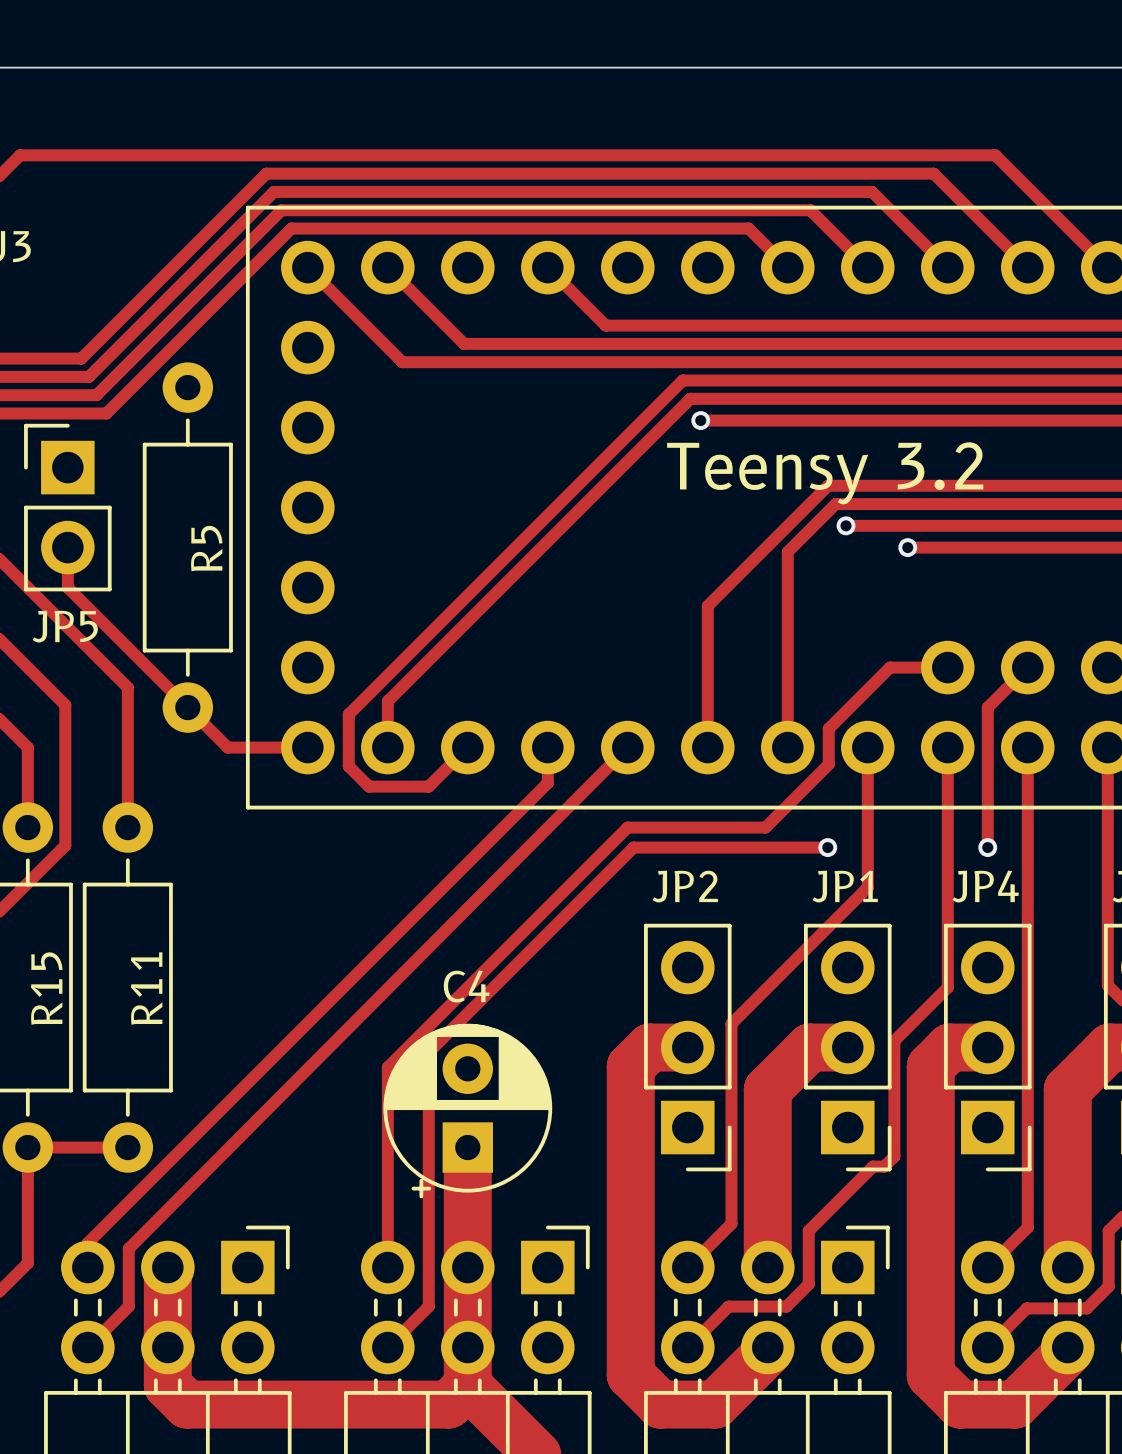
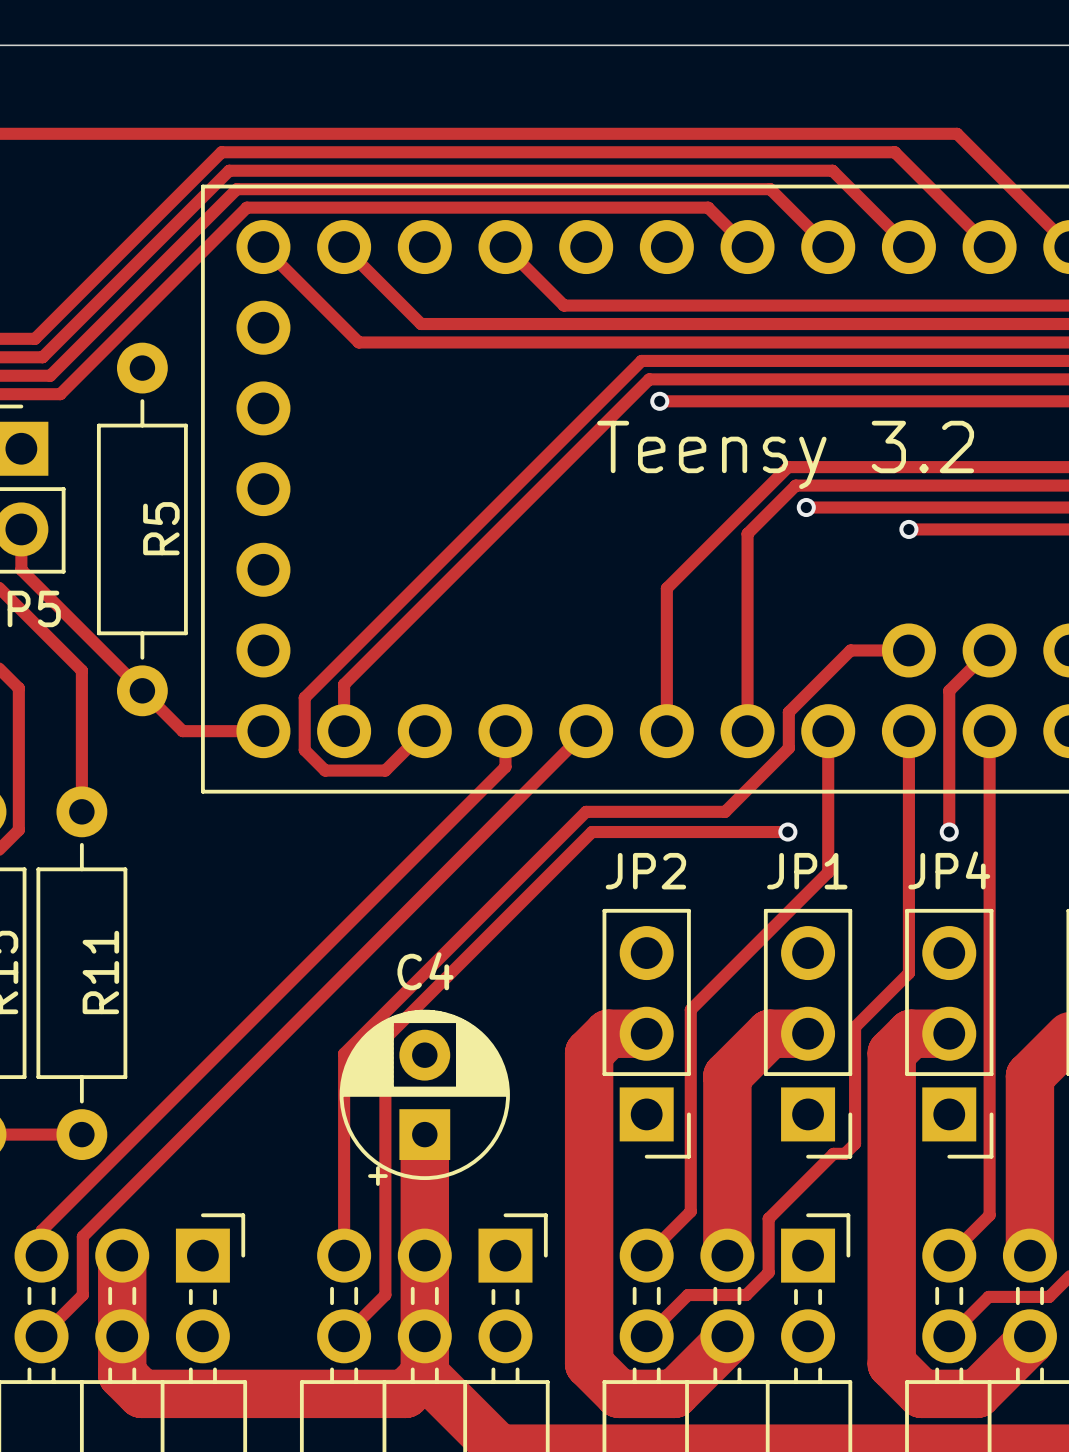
track: (907, 547) (947, 547) -> none
via position: (907, 547) -> (908, 529)

